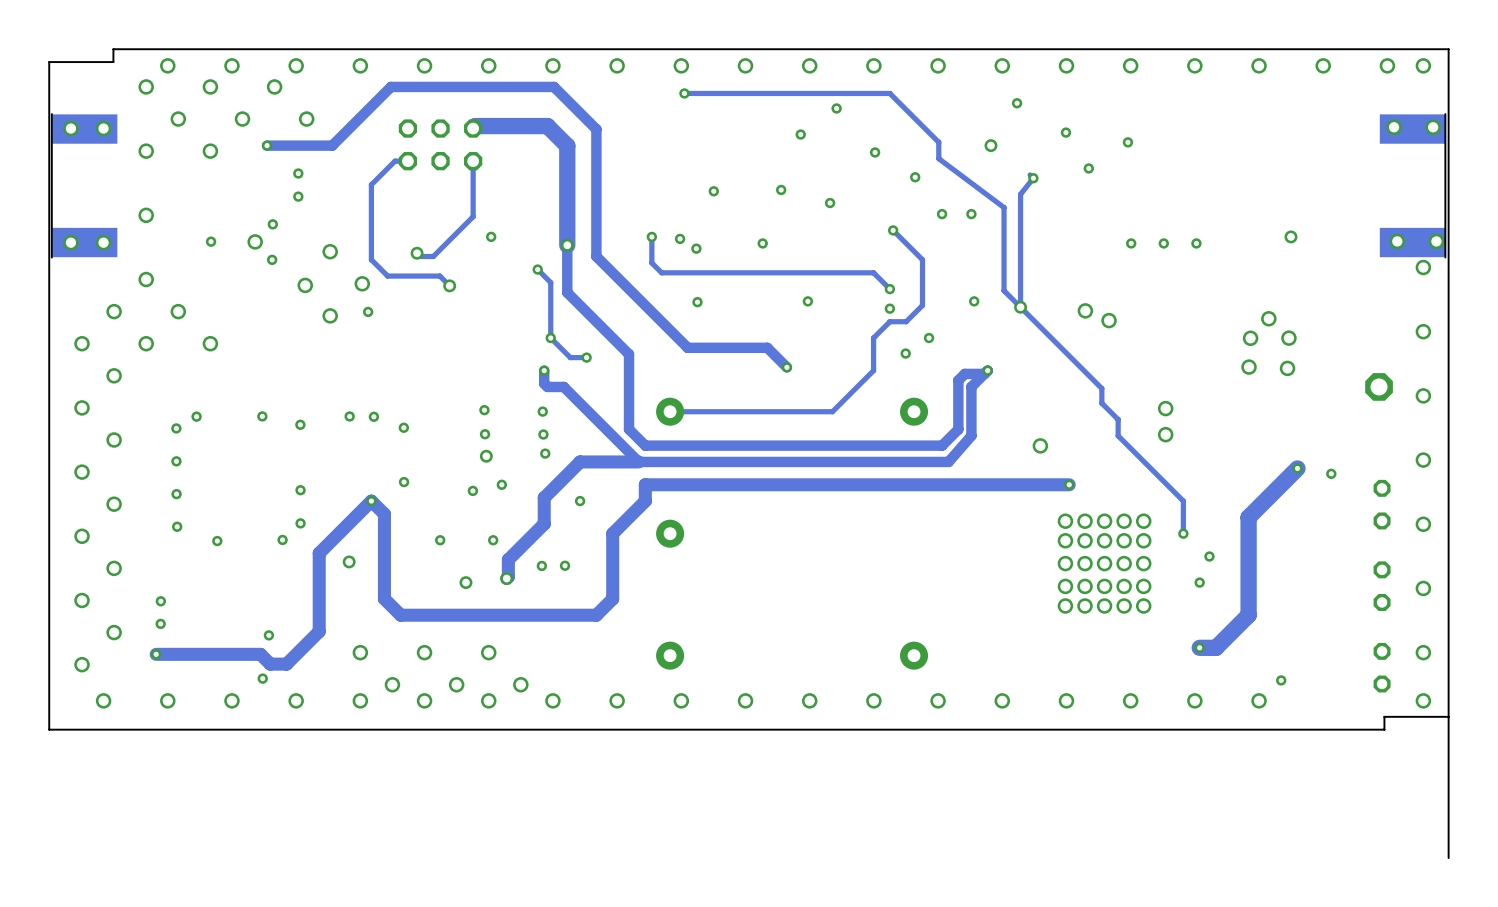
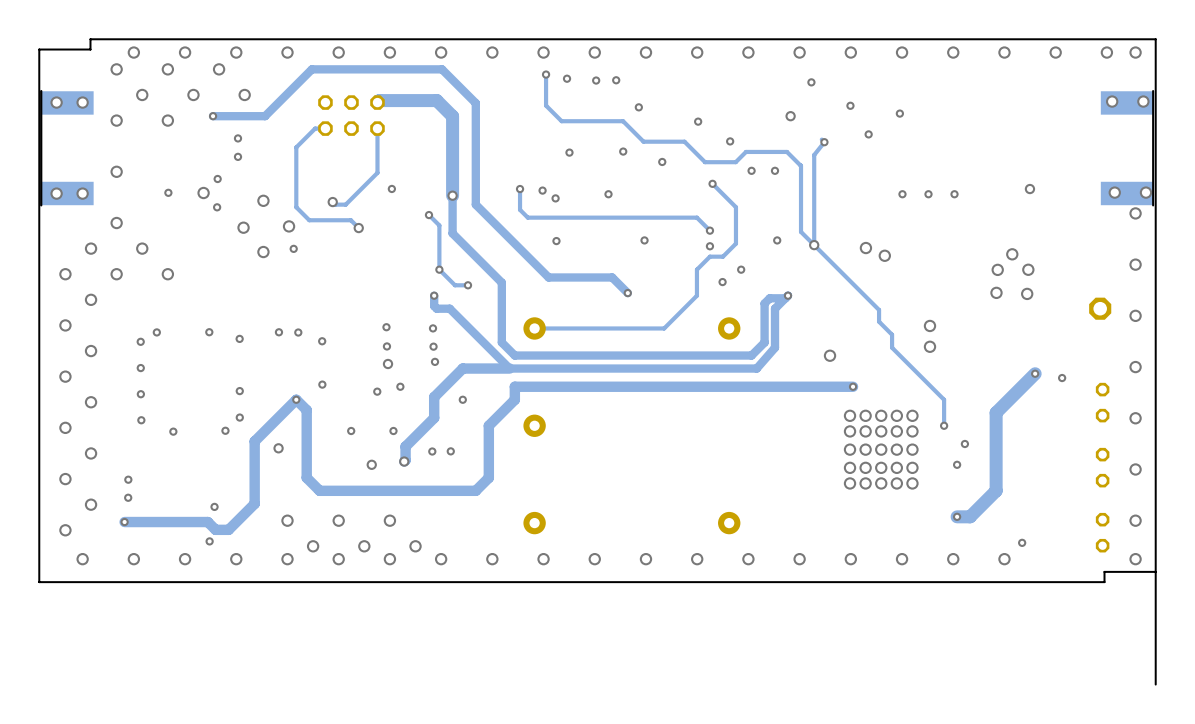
track: (684, 93) (889, 93) (938, 142) (938, 158) (1004, 207) -> (546, 74) (546, 105) (561, 121) (623, 121) (643, 141) (684, 141) (705, 162) (735, 162) (746, 151) (786, 151) (801, 165)
via: none -> (567, 78)
via: none -> (596, 80)
via: none -> (616, 80)
via: (836, 108) -> none

